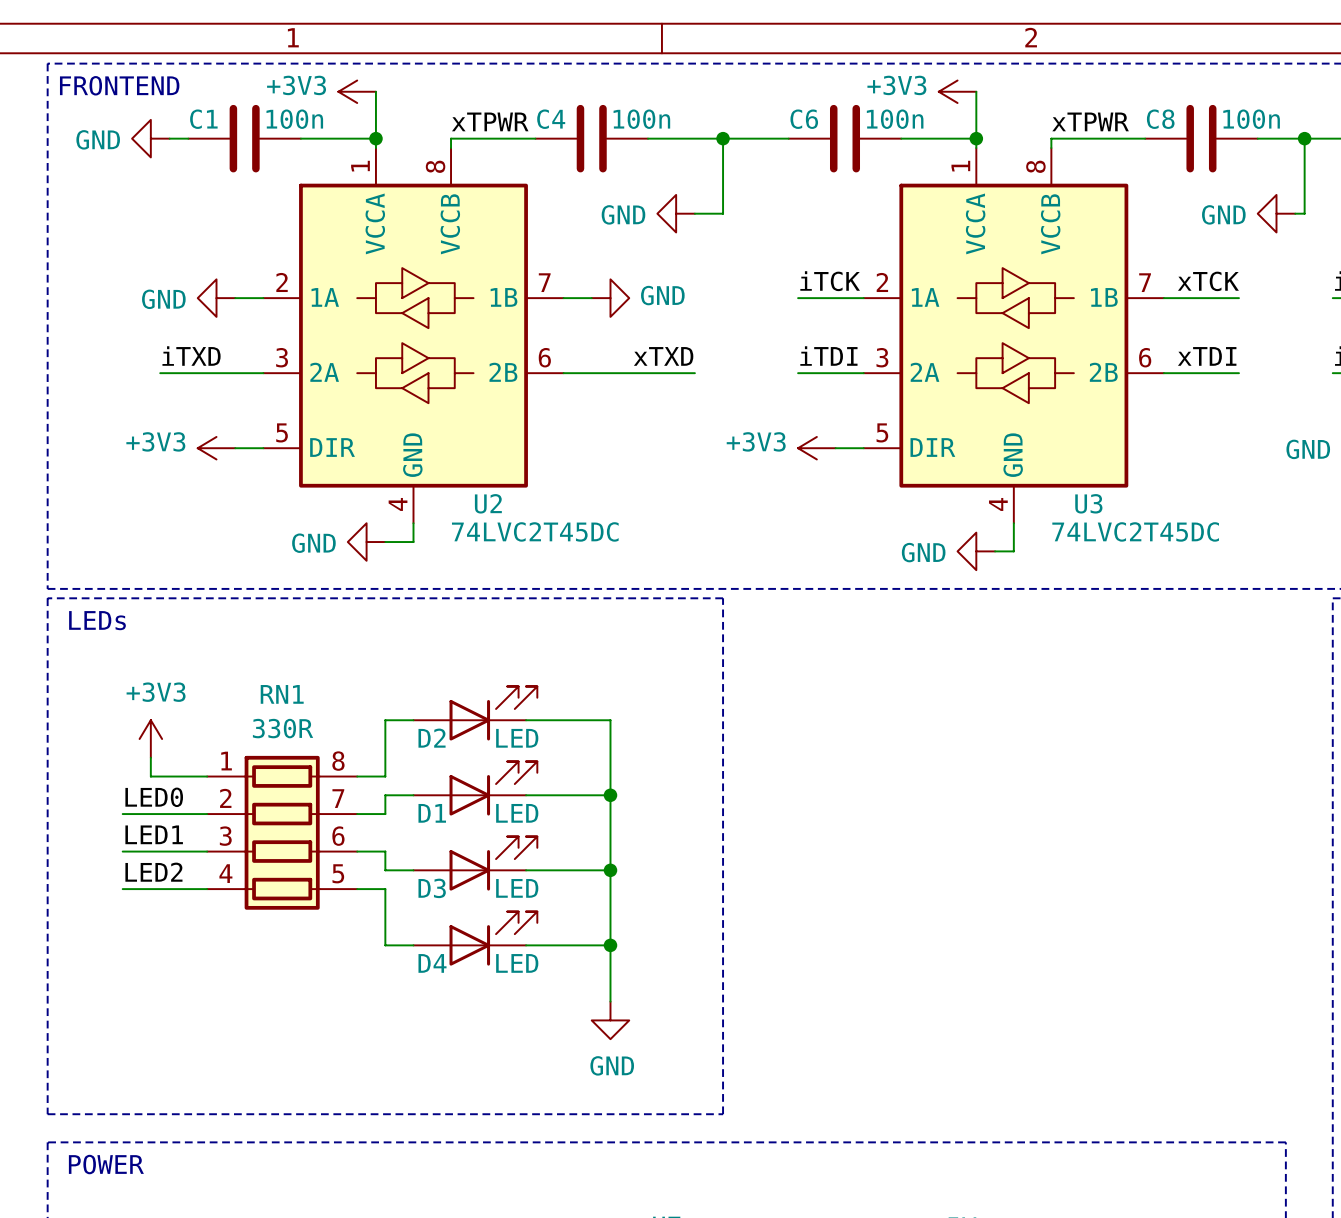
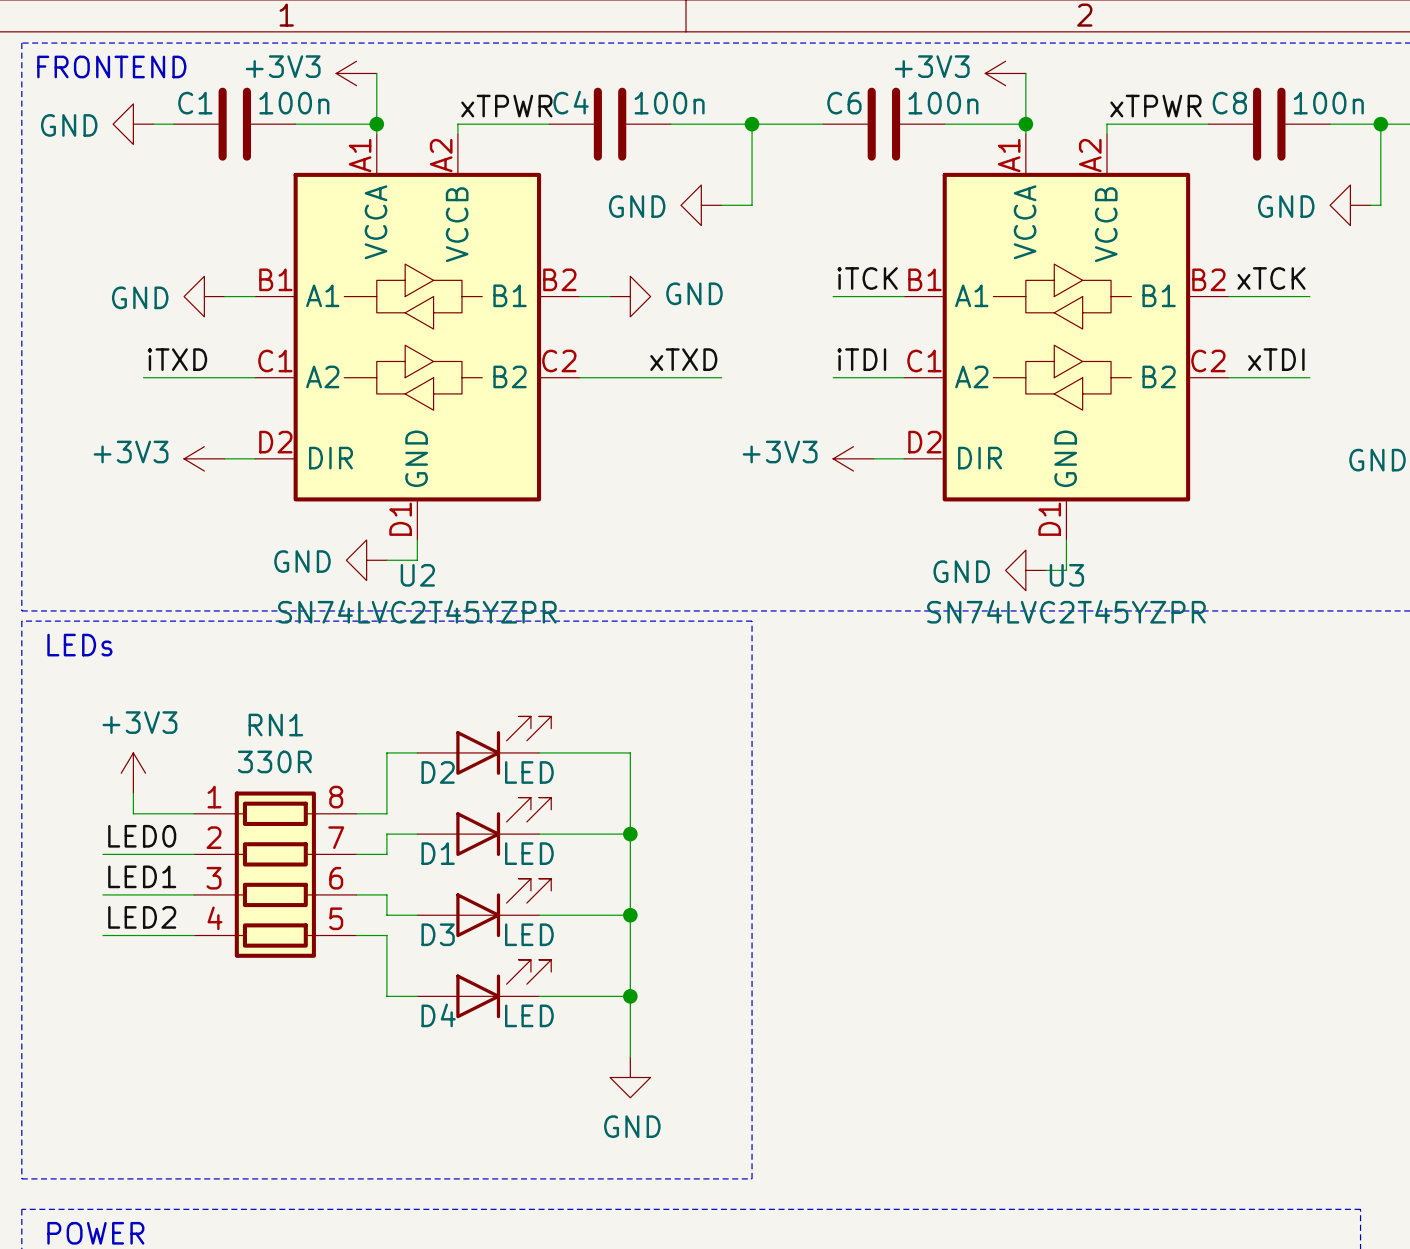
U2 symbol: [263, 148, 564, 524] -> [255, 134, 580, 540]
U3 symbol: [863, 148, 1164, 524] -> [904, 134, 1229, 540]
U2 name position: U2 (488, 503) -> U2 (417, 575)
U3 name position: U3 (1088, 503) -> U3 (1066, 575)
U2 value: 74LVC2T45DC (535, 531) -> SN74LVC2T45YZPR (417, 611)
U3 value: 74LVC2T45DC (1135, 531) -> SN74LVC2T45YZPR (1066, 611)

